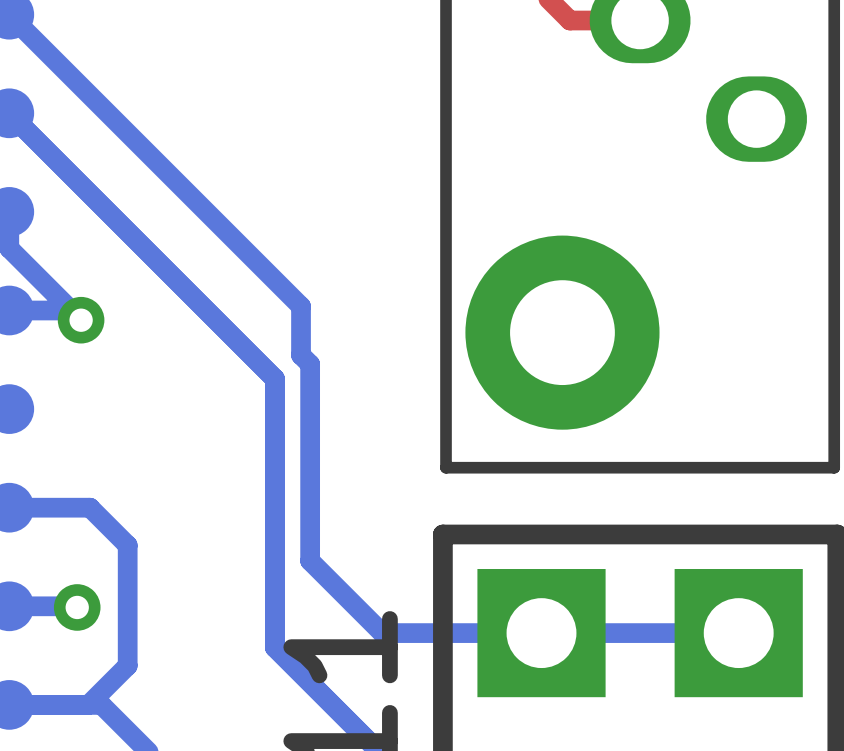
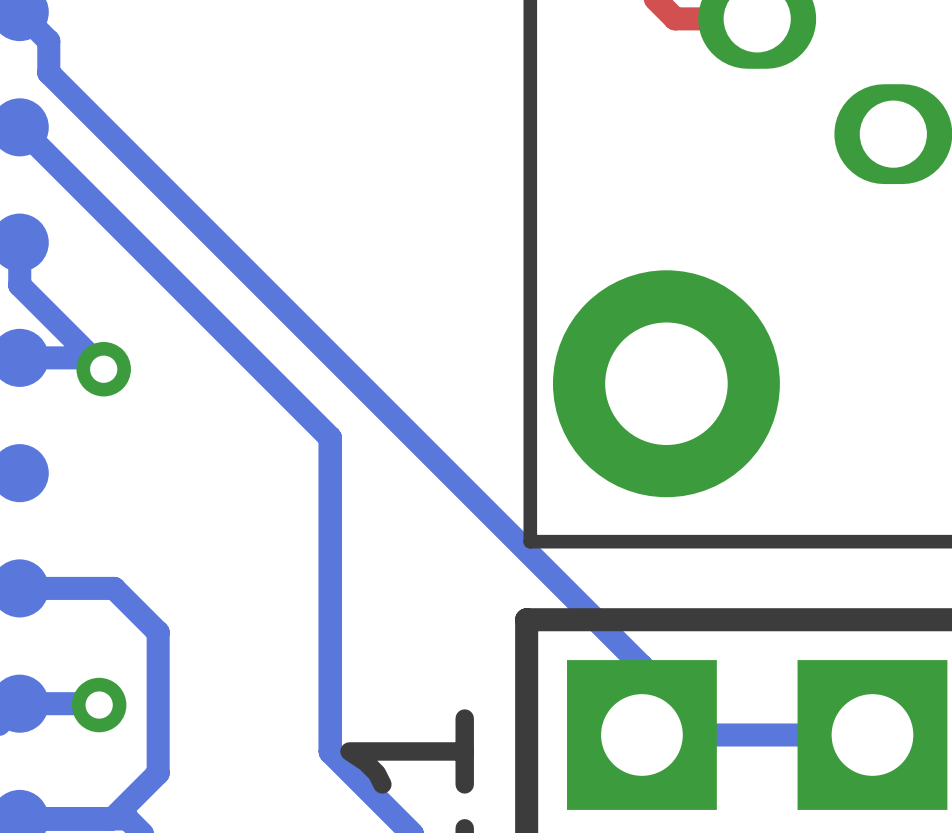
bottom track: (34, 39) (301, 306) (301, 355) (310, 364) (310, 560) (382, 633) (541, 633) -> (48, 41) (48, 72) (641, 666) (641, 735)

